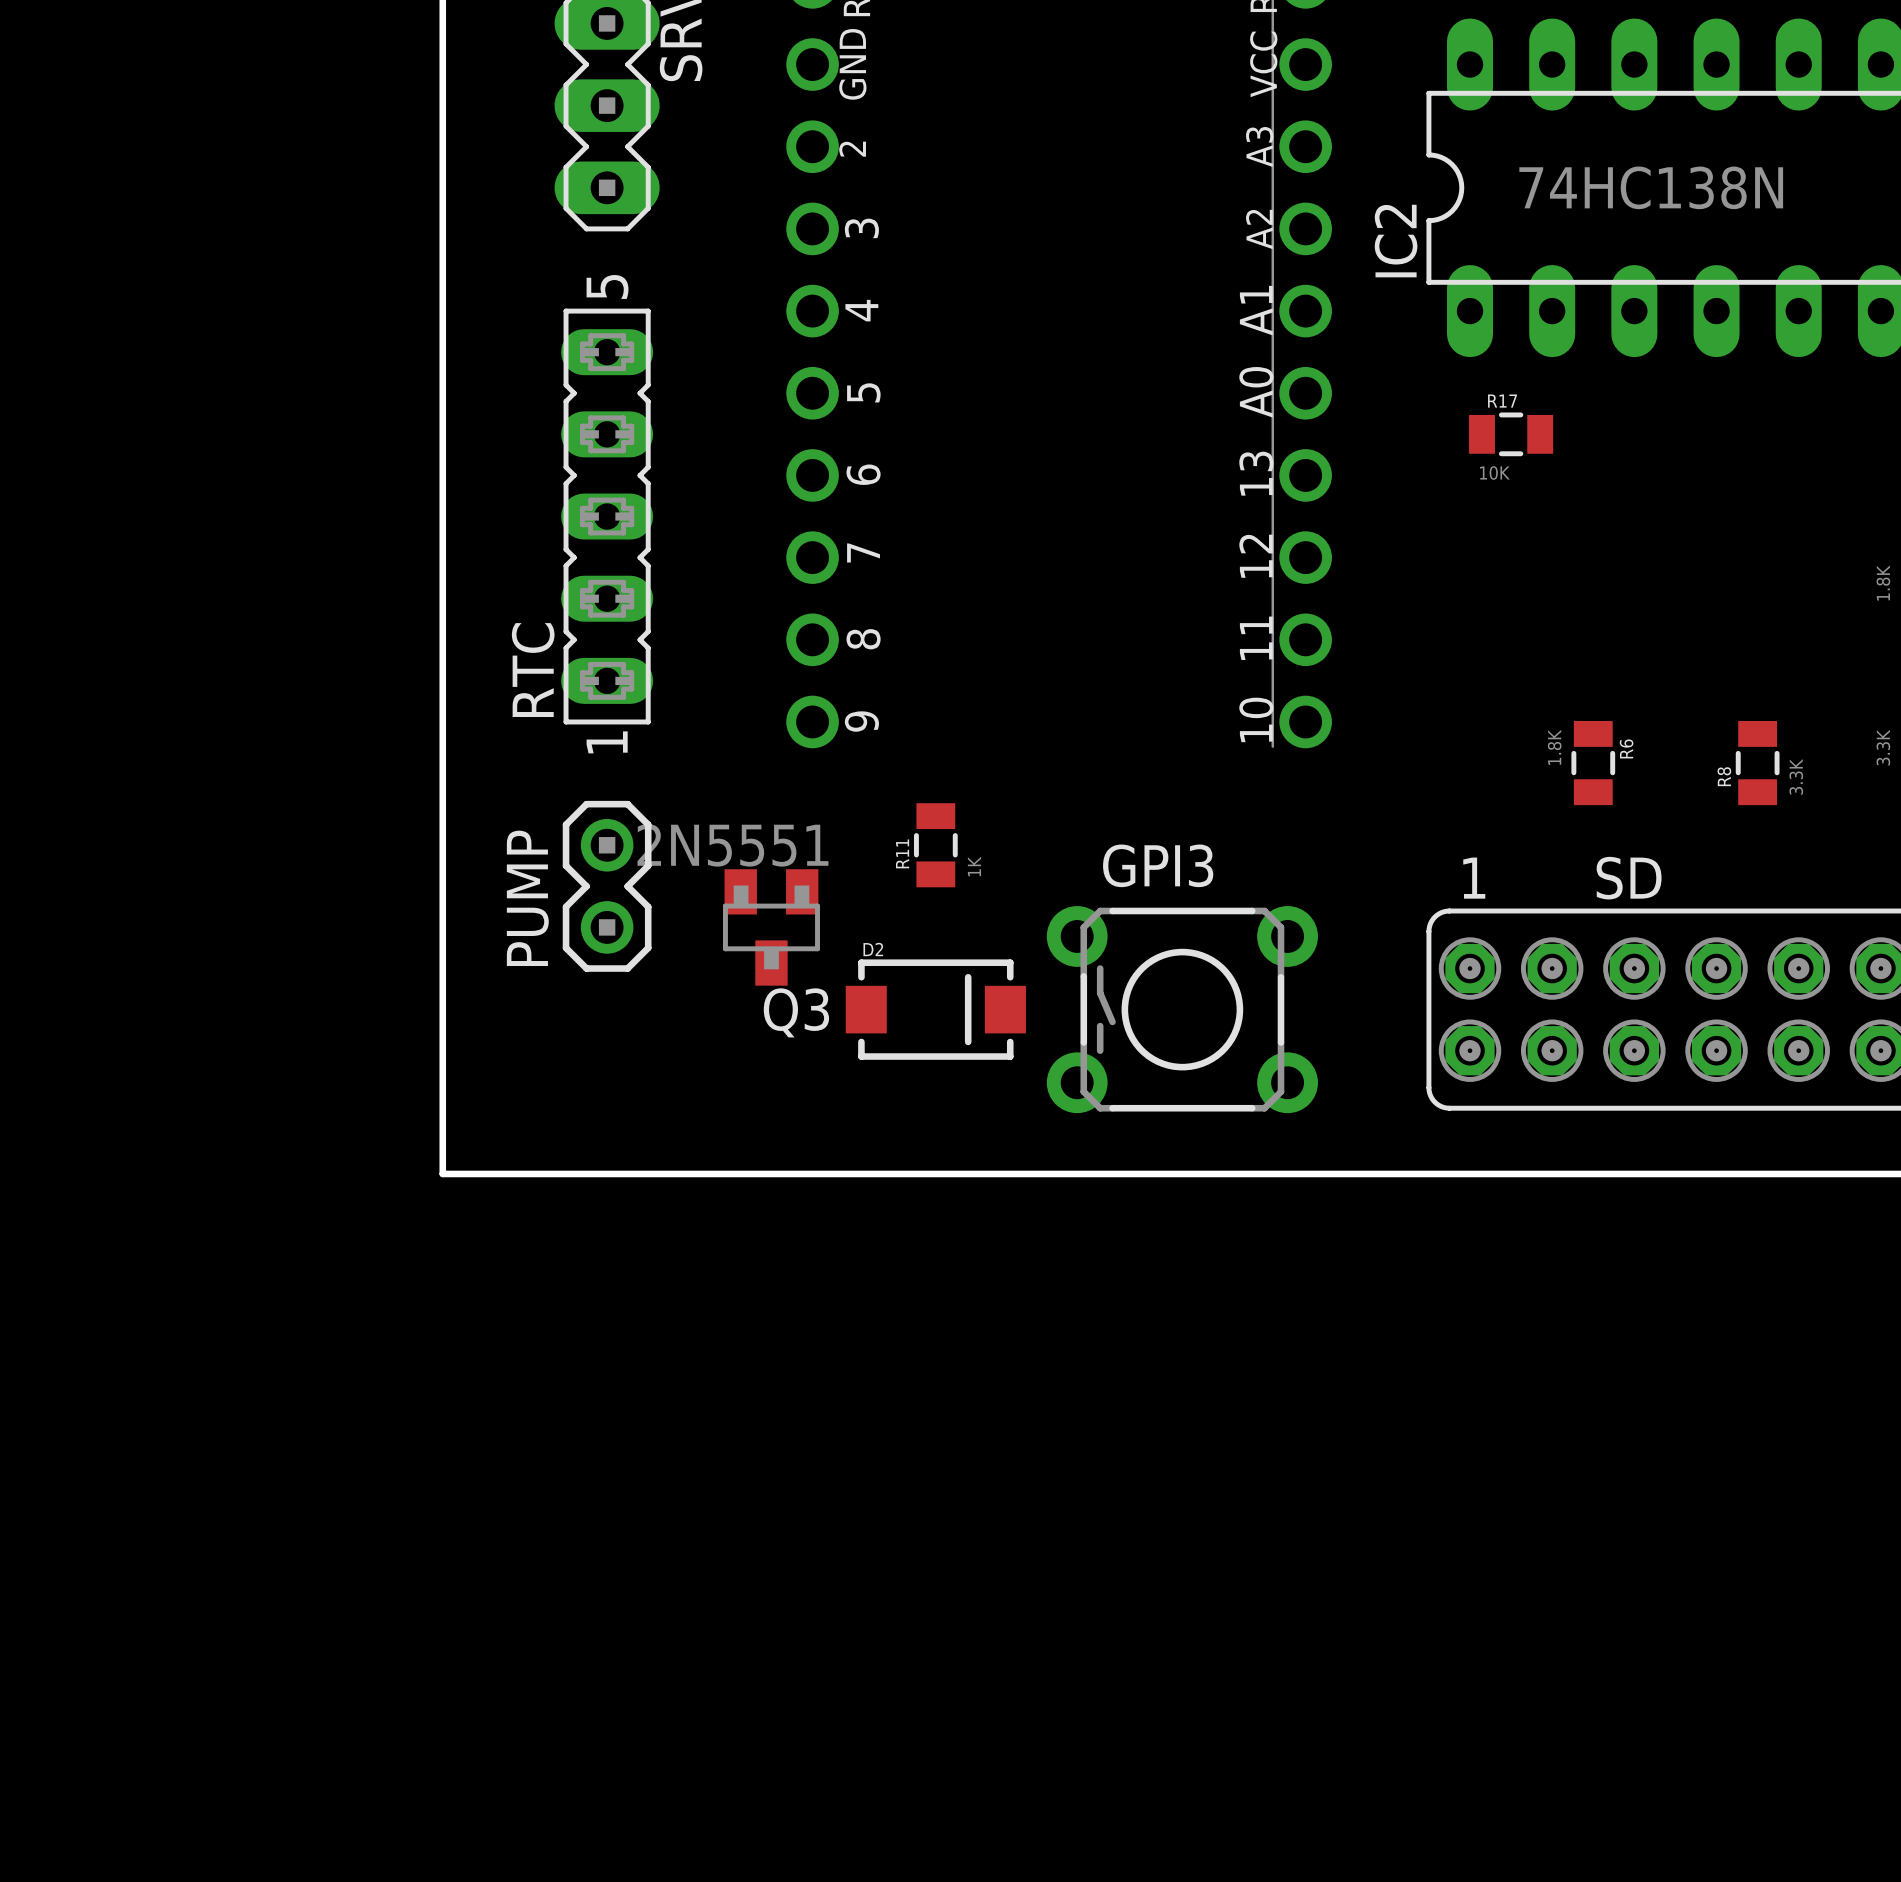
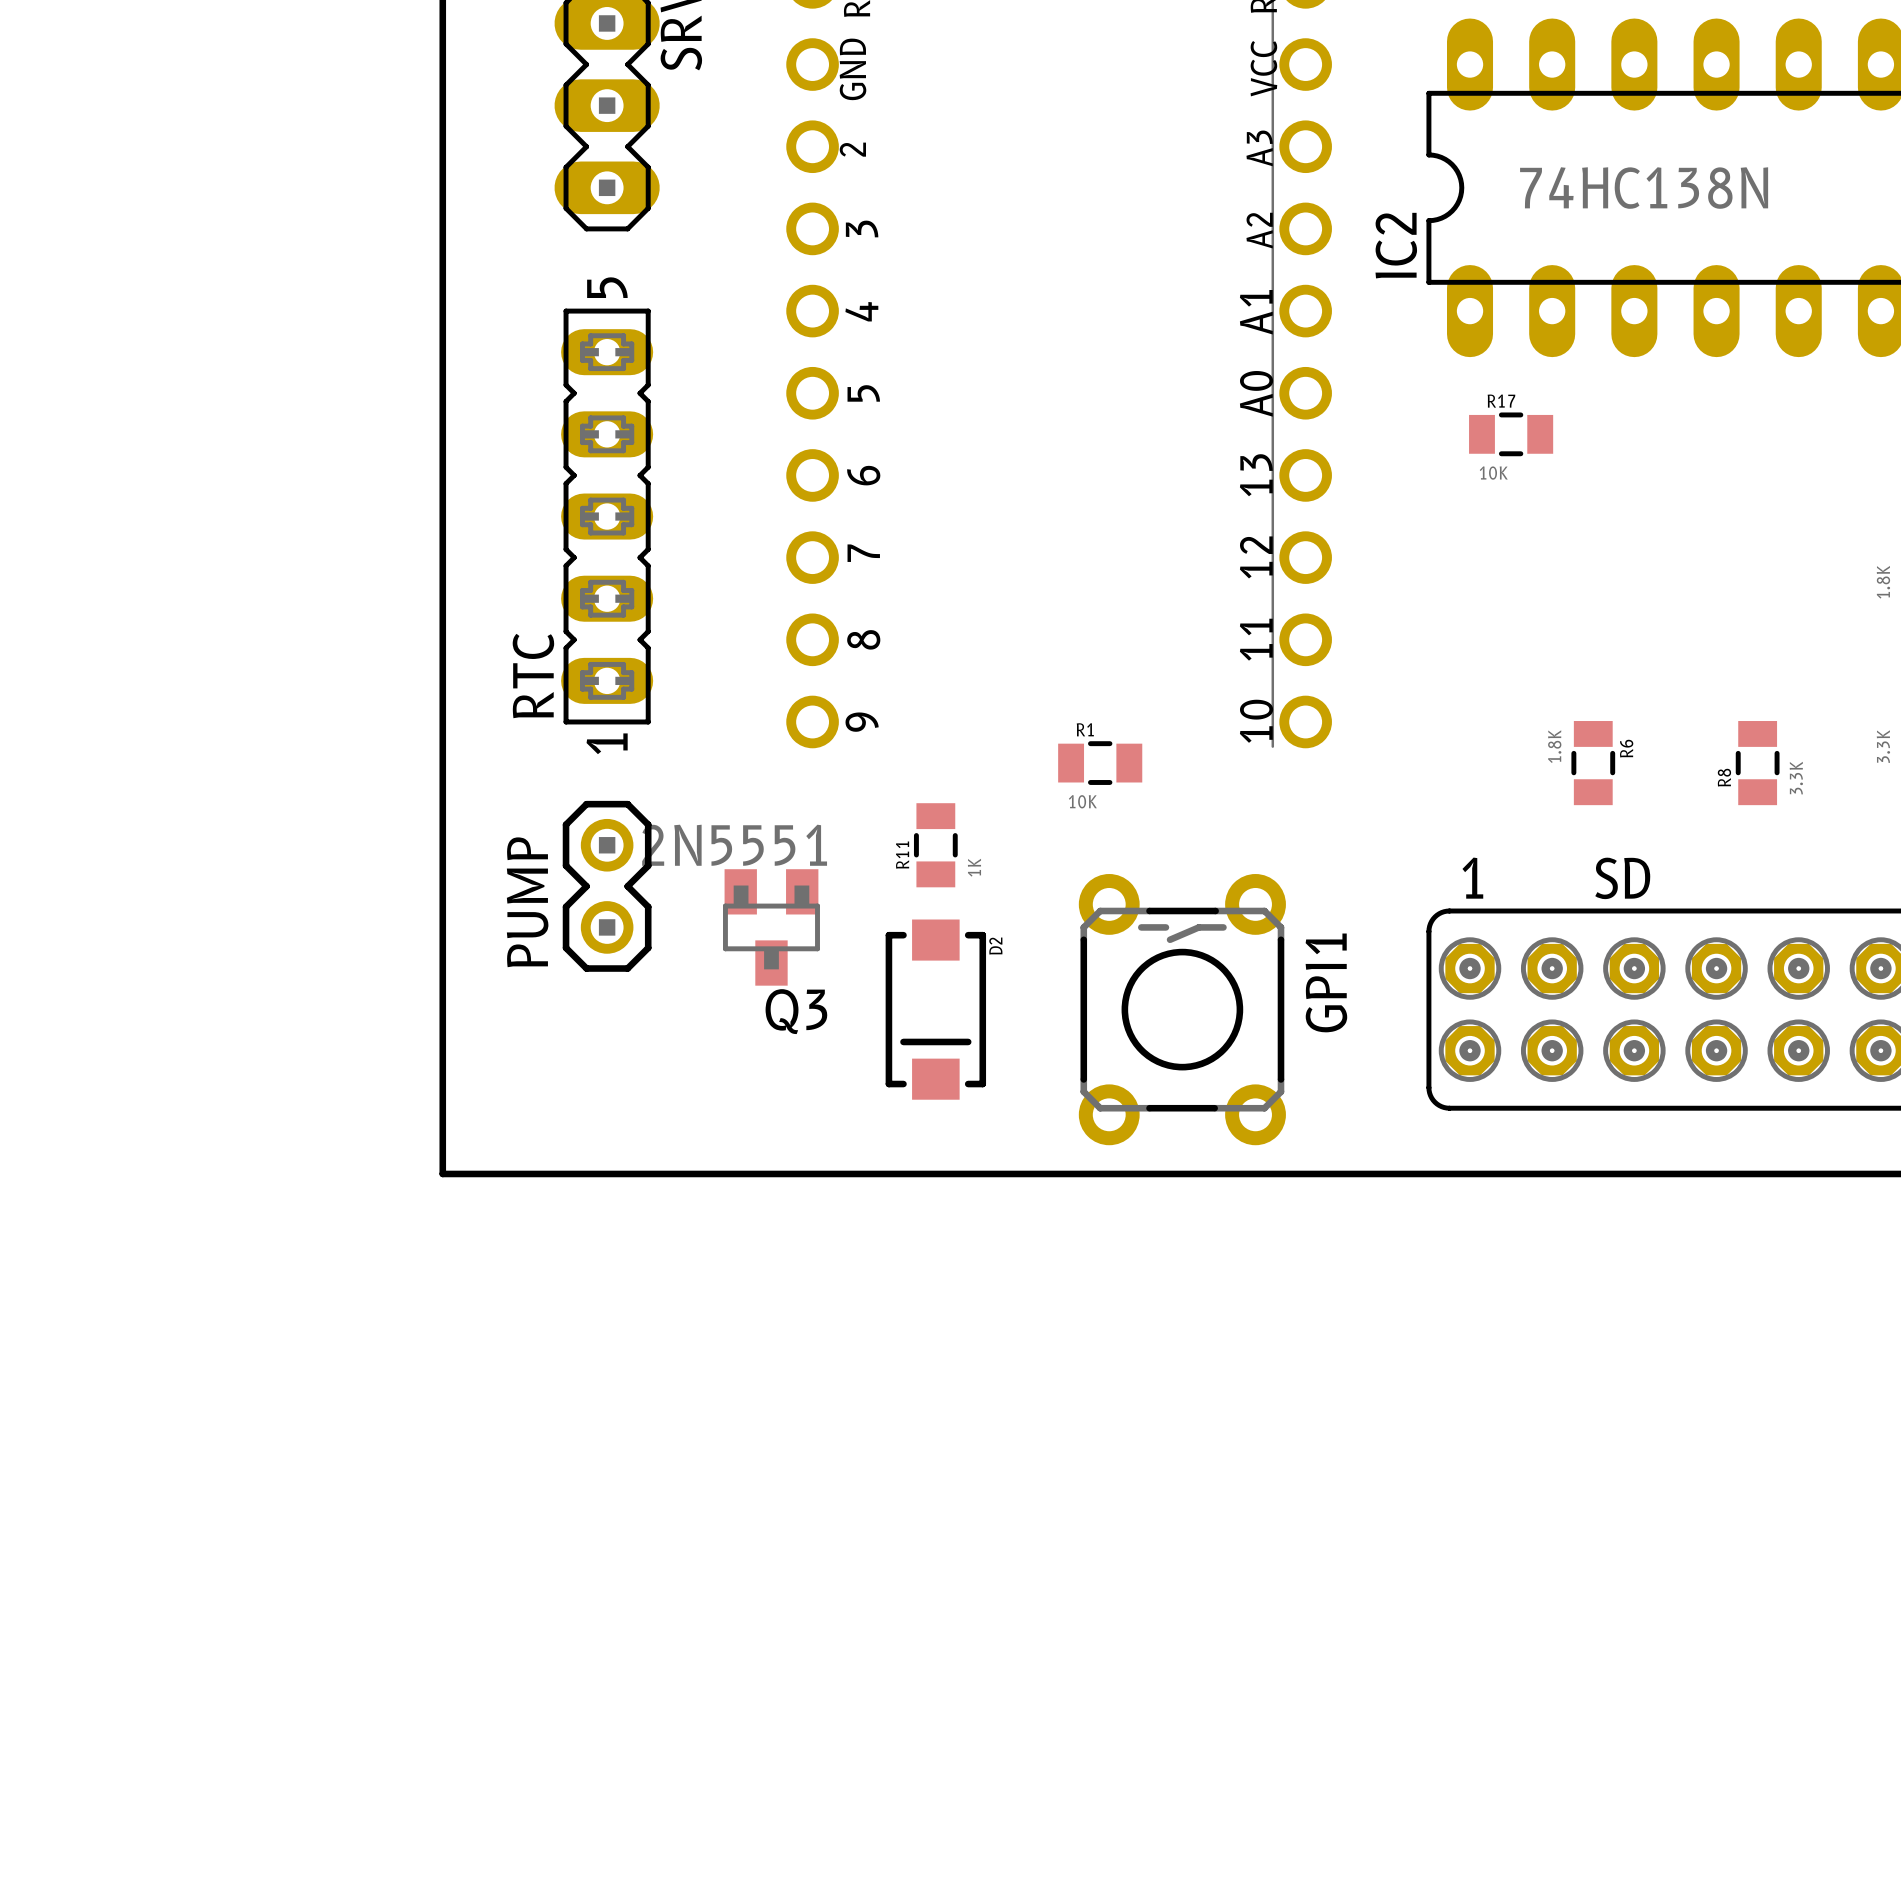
R1: none -> 10K (1100, 763)
D2 rotation: 0° (935, 1009) -> 90° clockwise (935, 1009)
GPI3: (1182, 1009) -> none
GPI1: none -> (1182, 1009)

